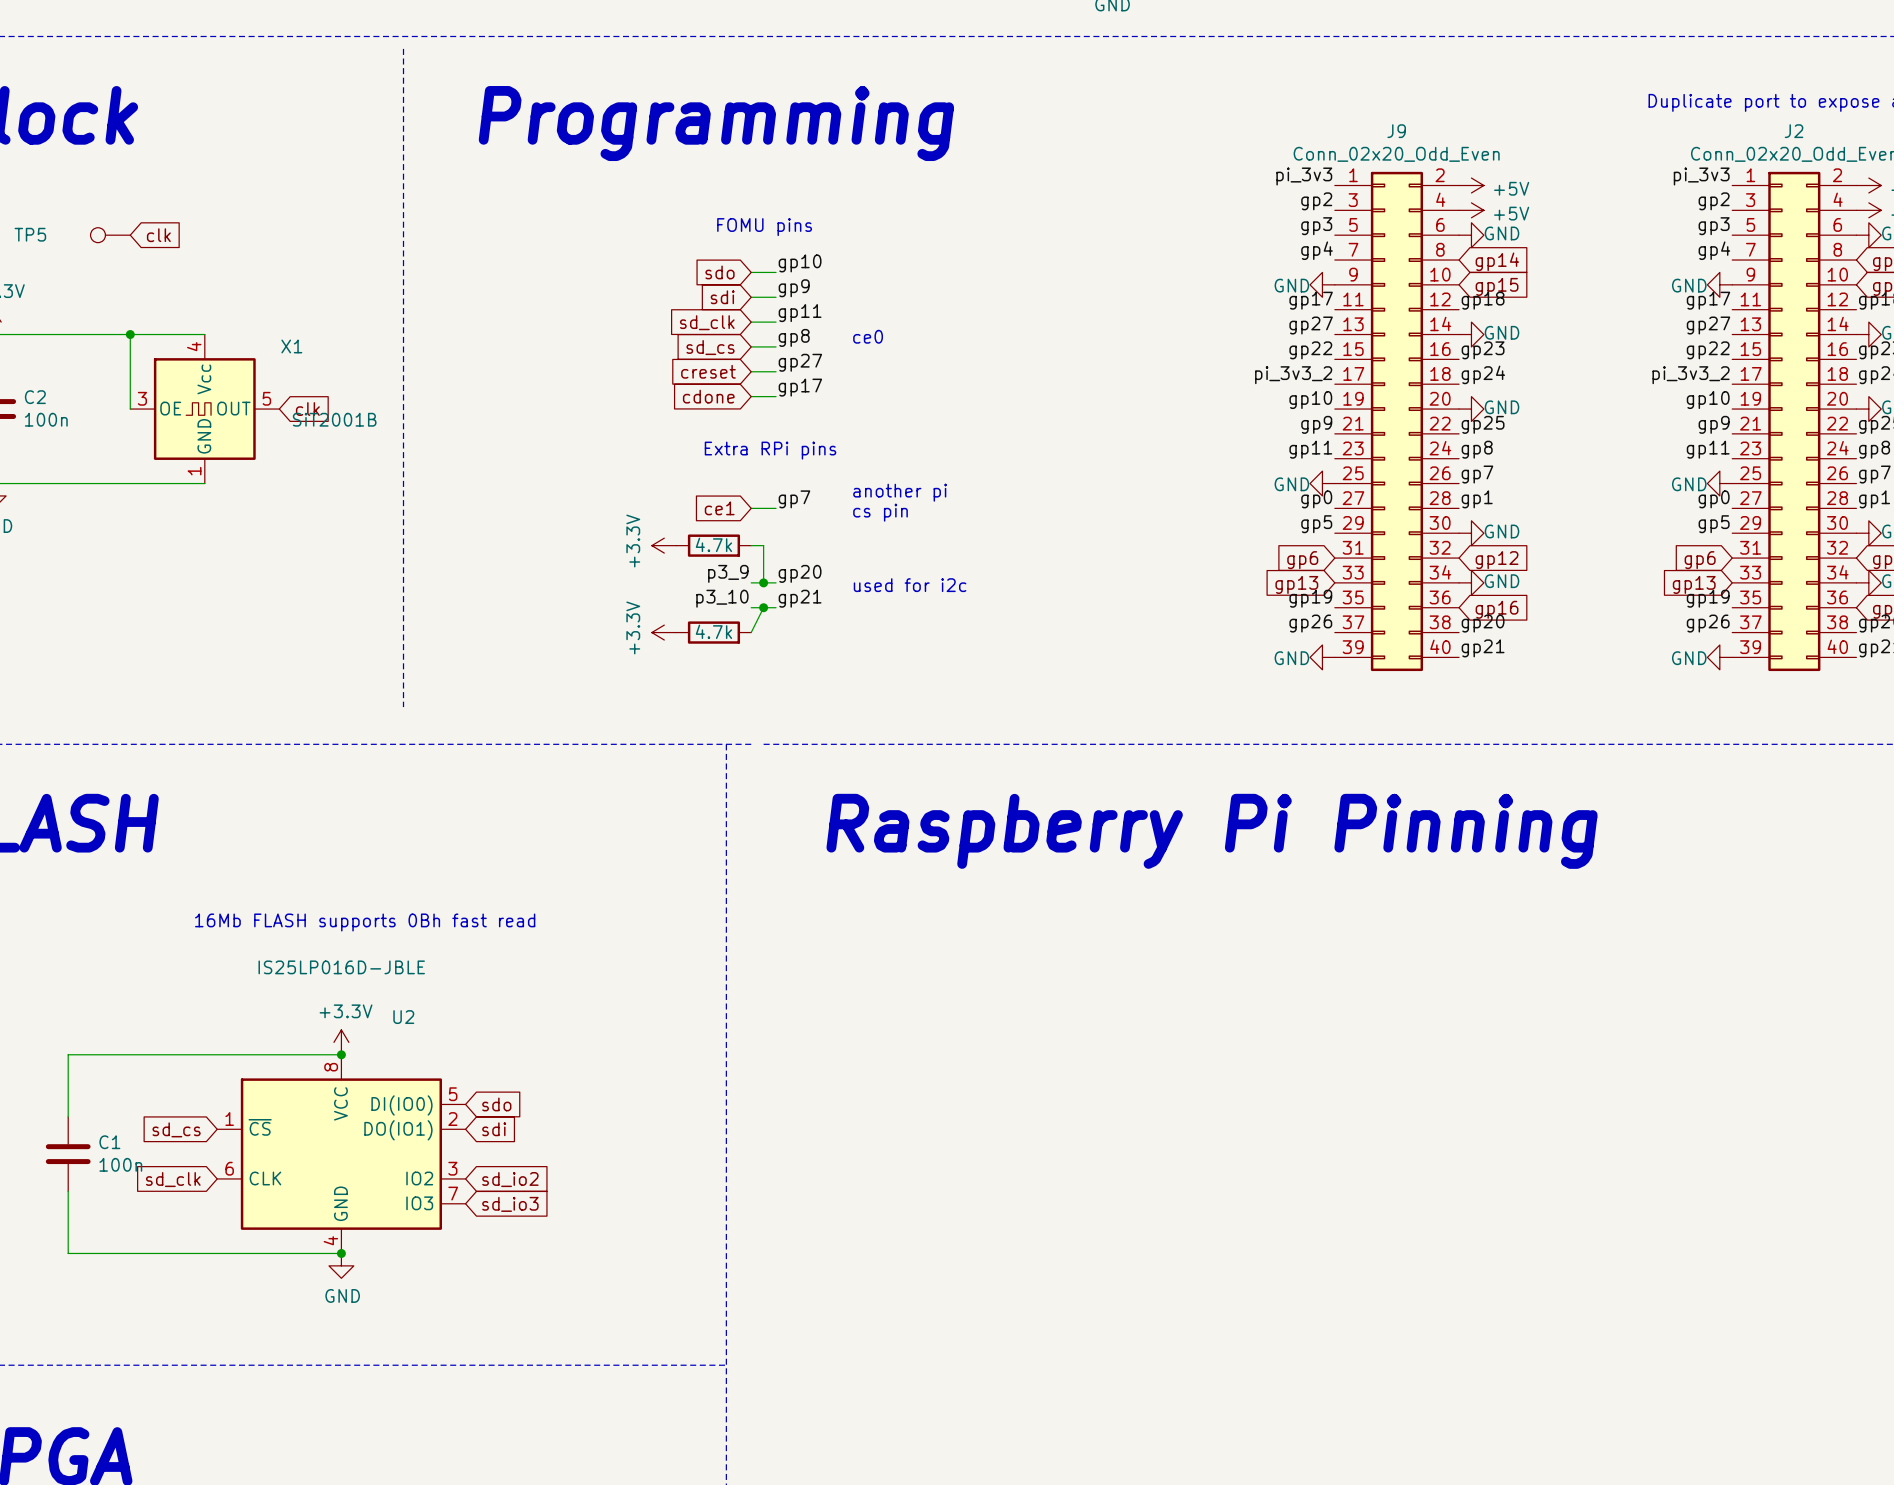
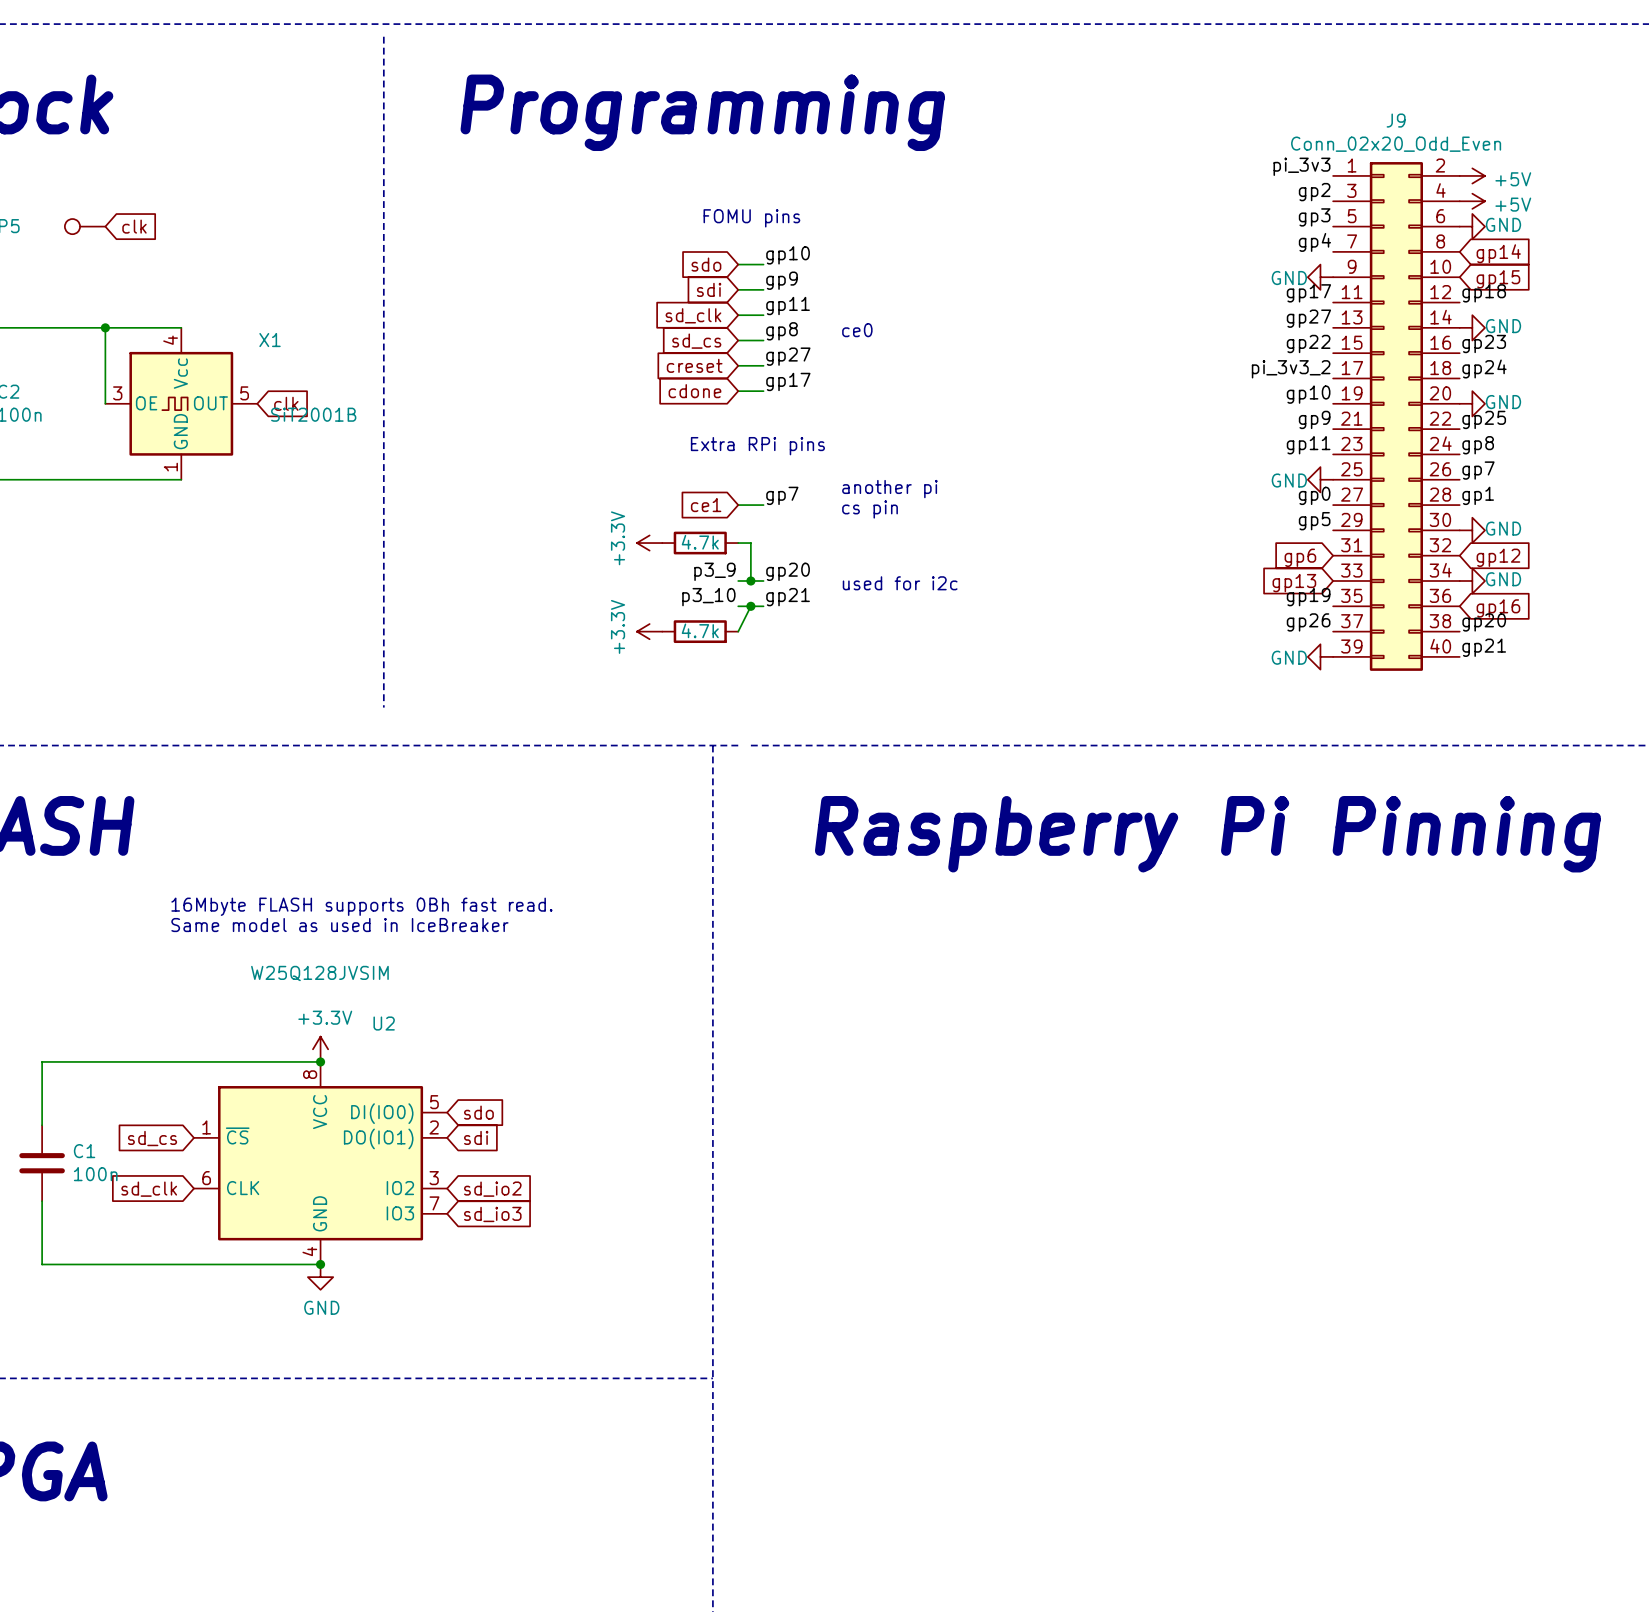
text: none -> 16Mbyte FLASH supports 0Bh fast read. (361, 906)
text: 16Mb FLASH supports 0Bh fast read (365, 922) -> Same model as used in IceBreaker (339, 925)
U2 value: IS25LP016D-JBLE (341, 967) -> W25Q128JVSIM (319, 973)

